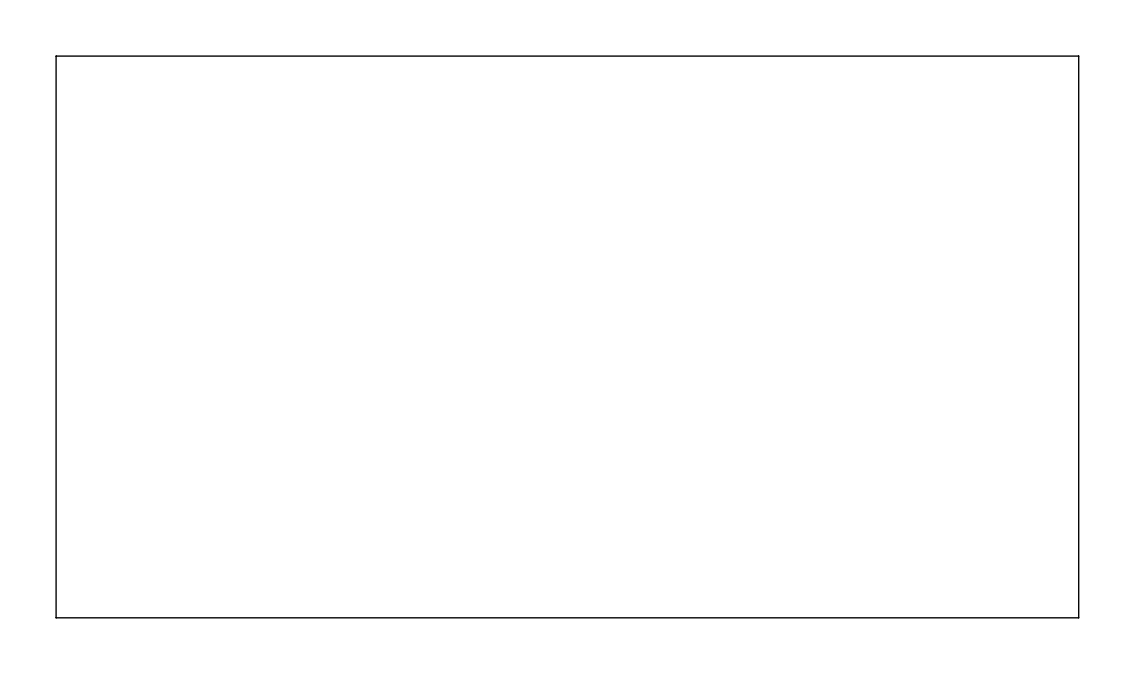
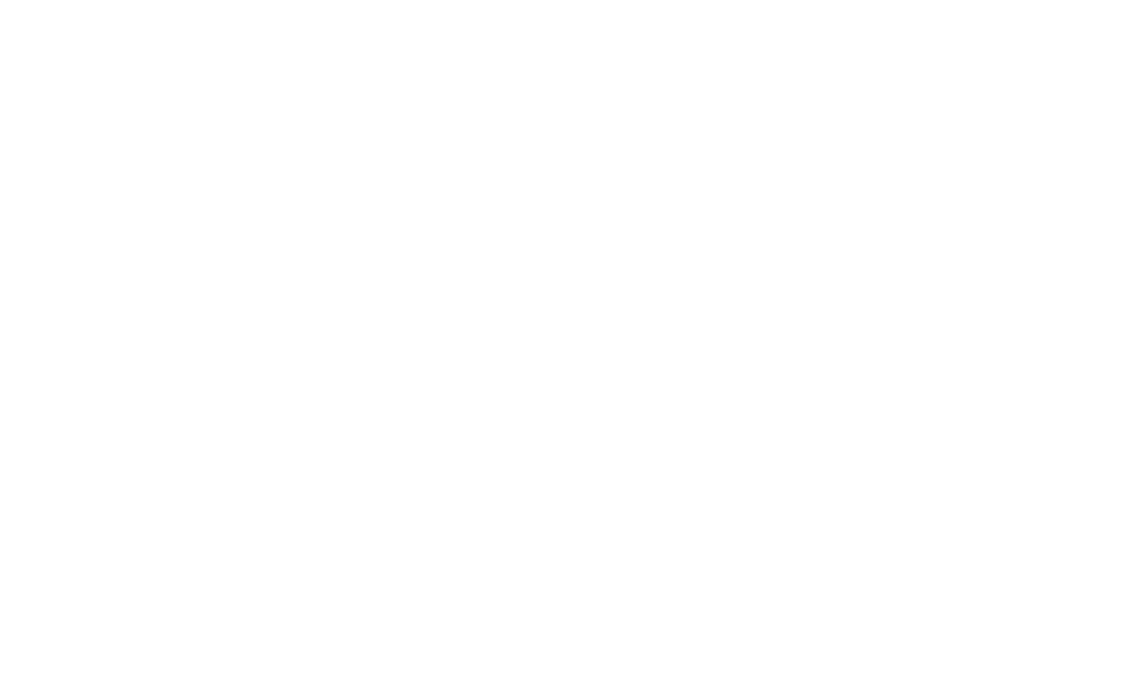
board edge: (56, 56) (1078, 56) (1078, 617) (56, 617) (56, 56) -> none

